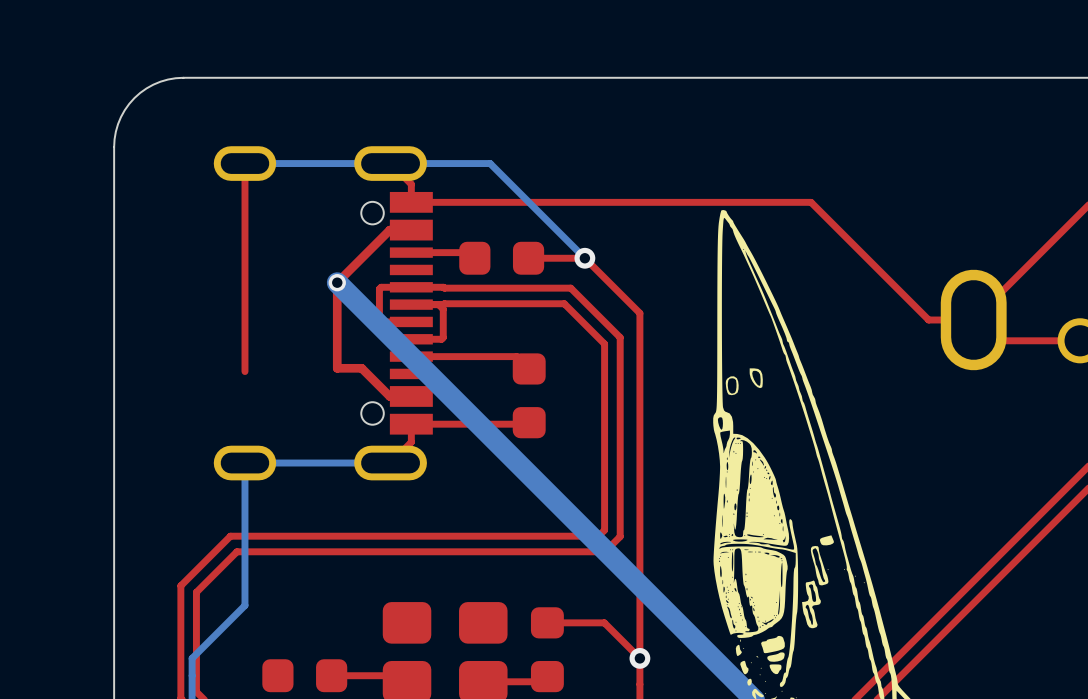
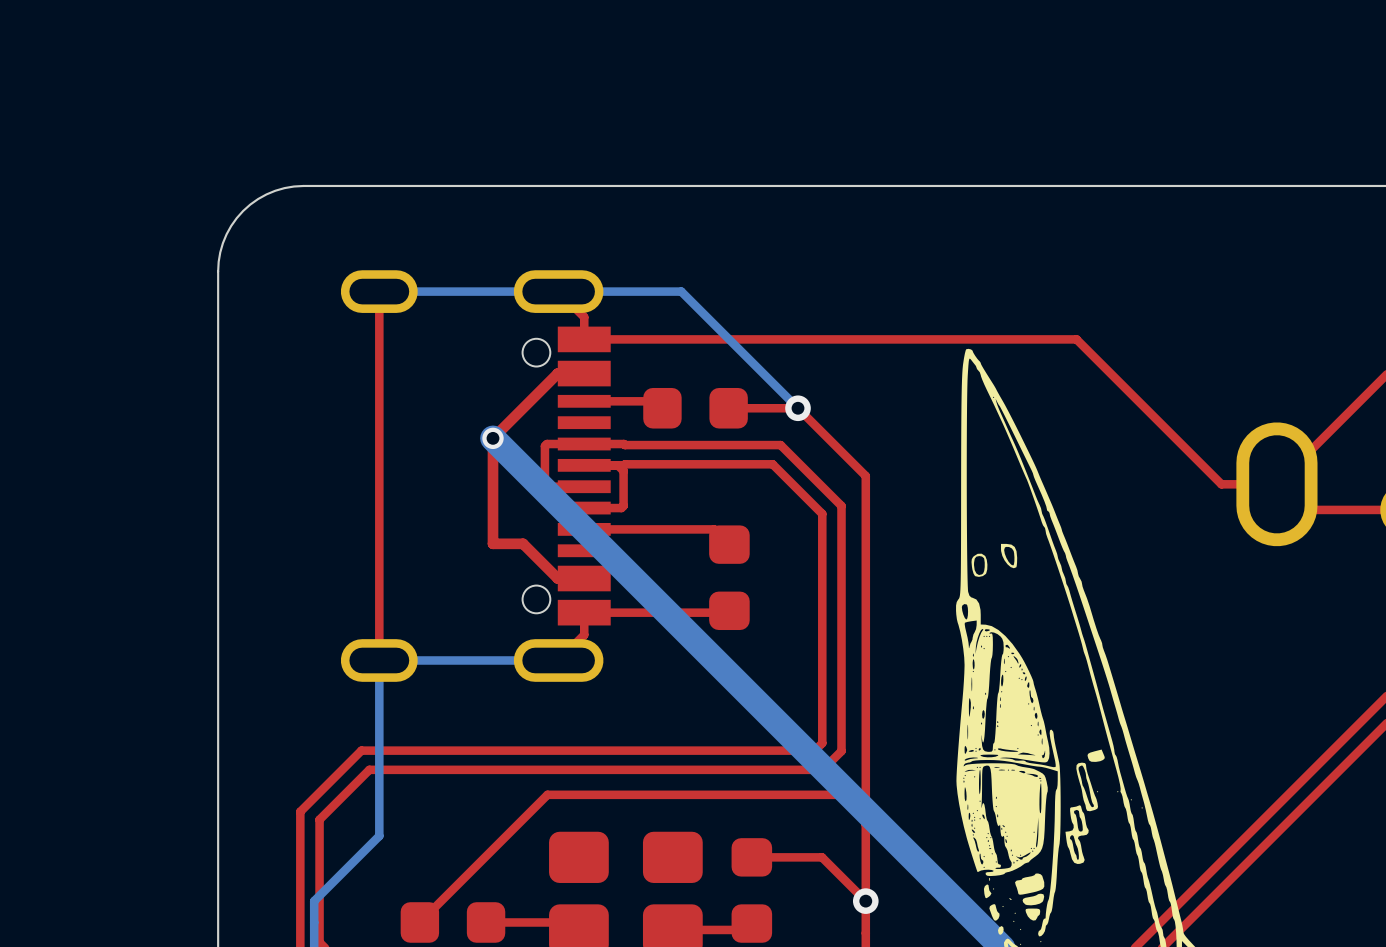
top track: none -> (379, 547) (379, 660)
top track: none -> (865, 819) (840, 794) (547, 794) (419, 922)

